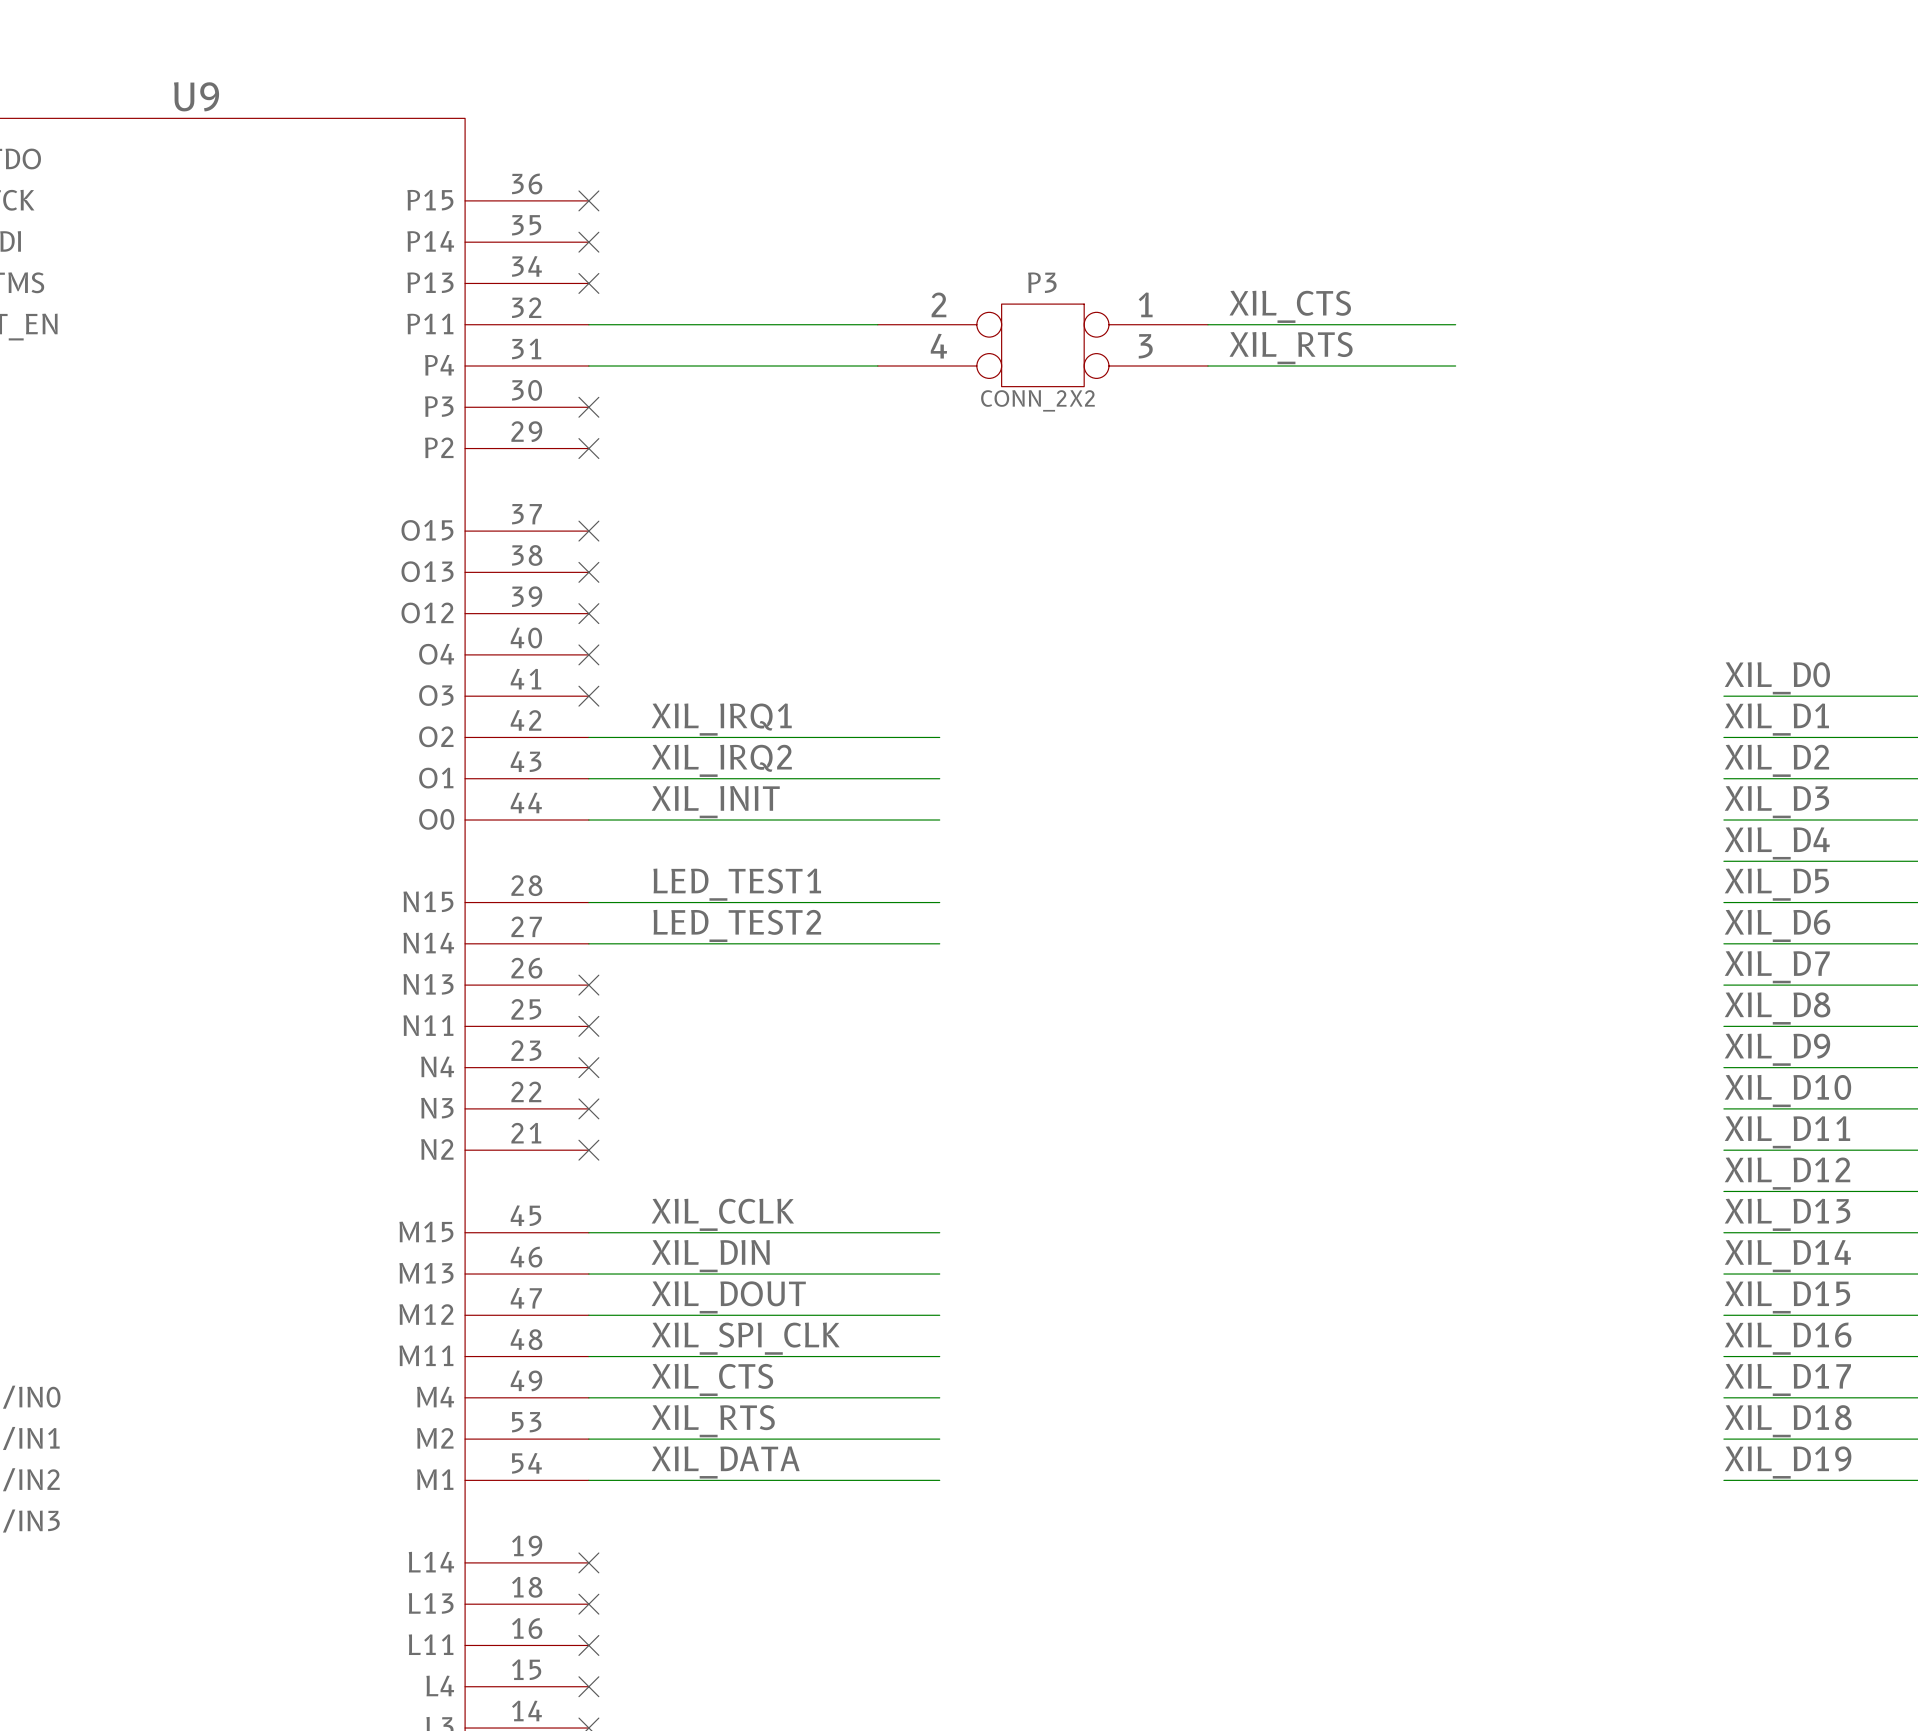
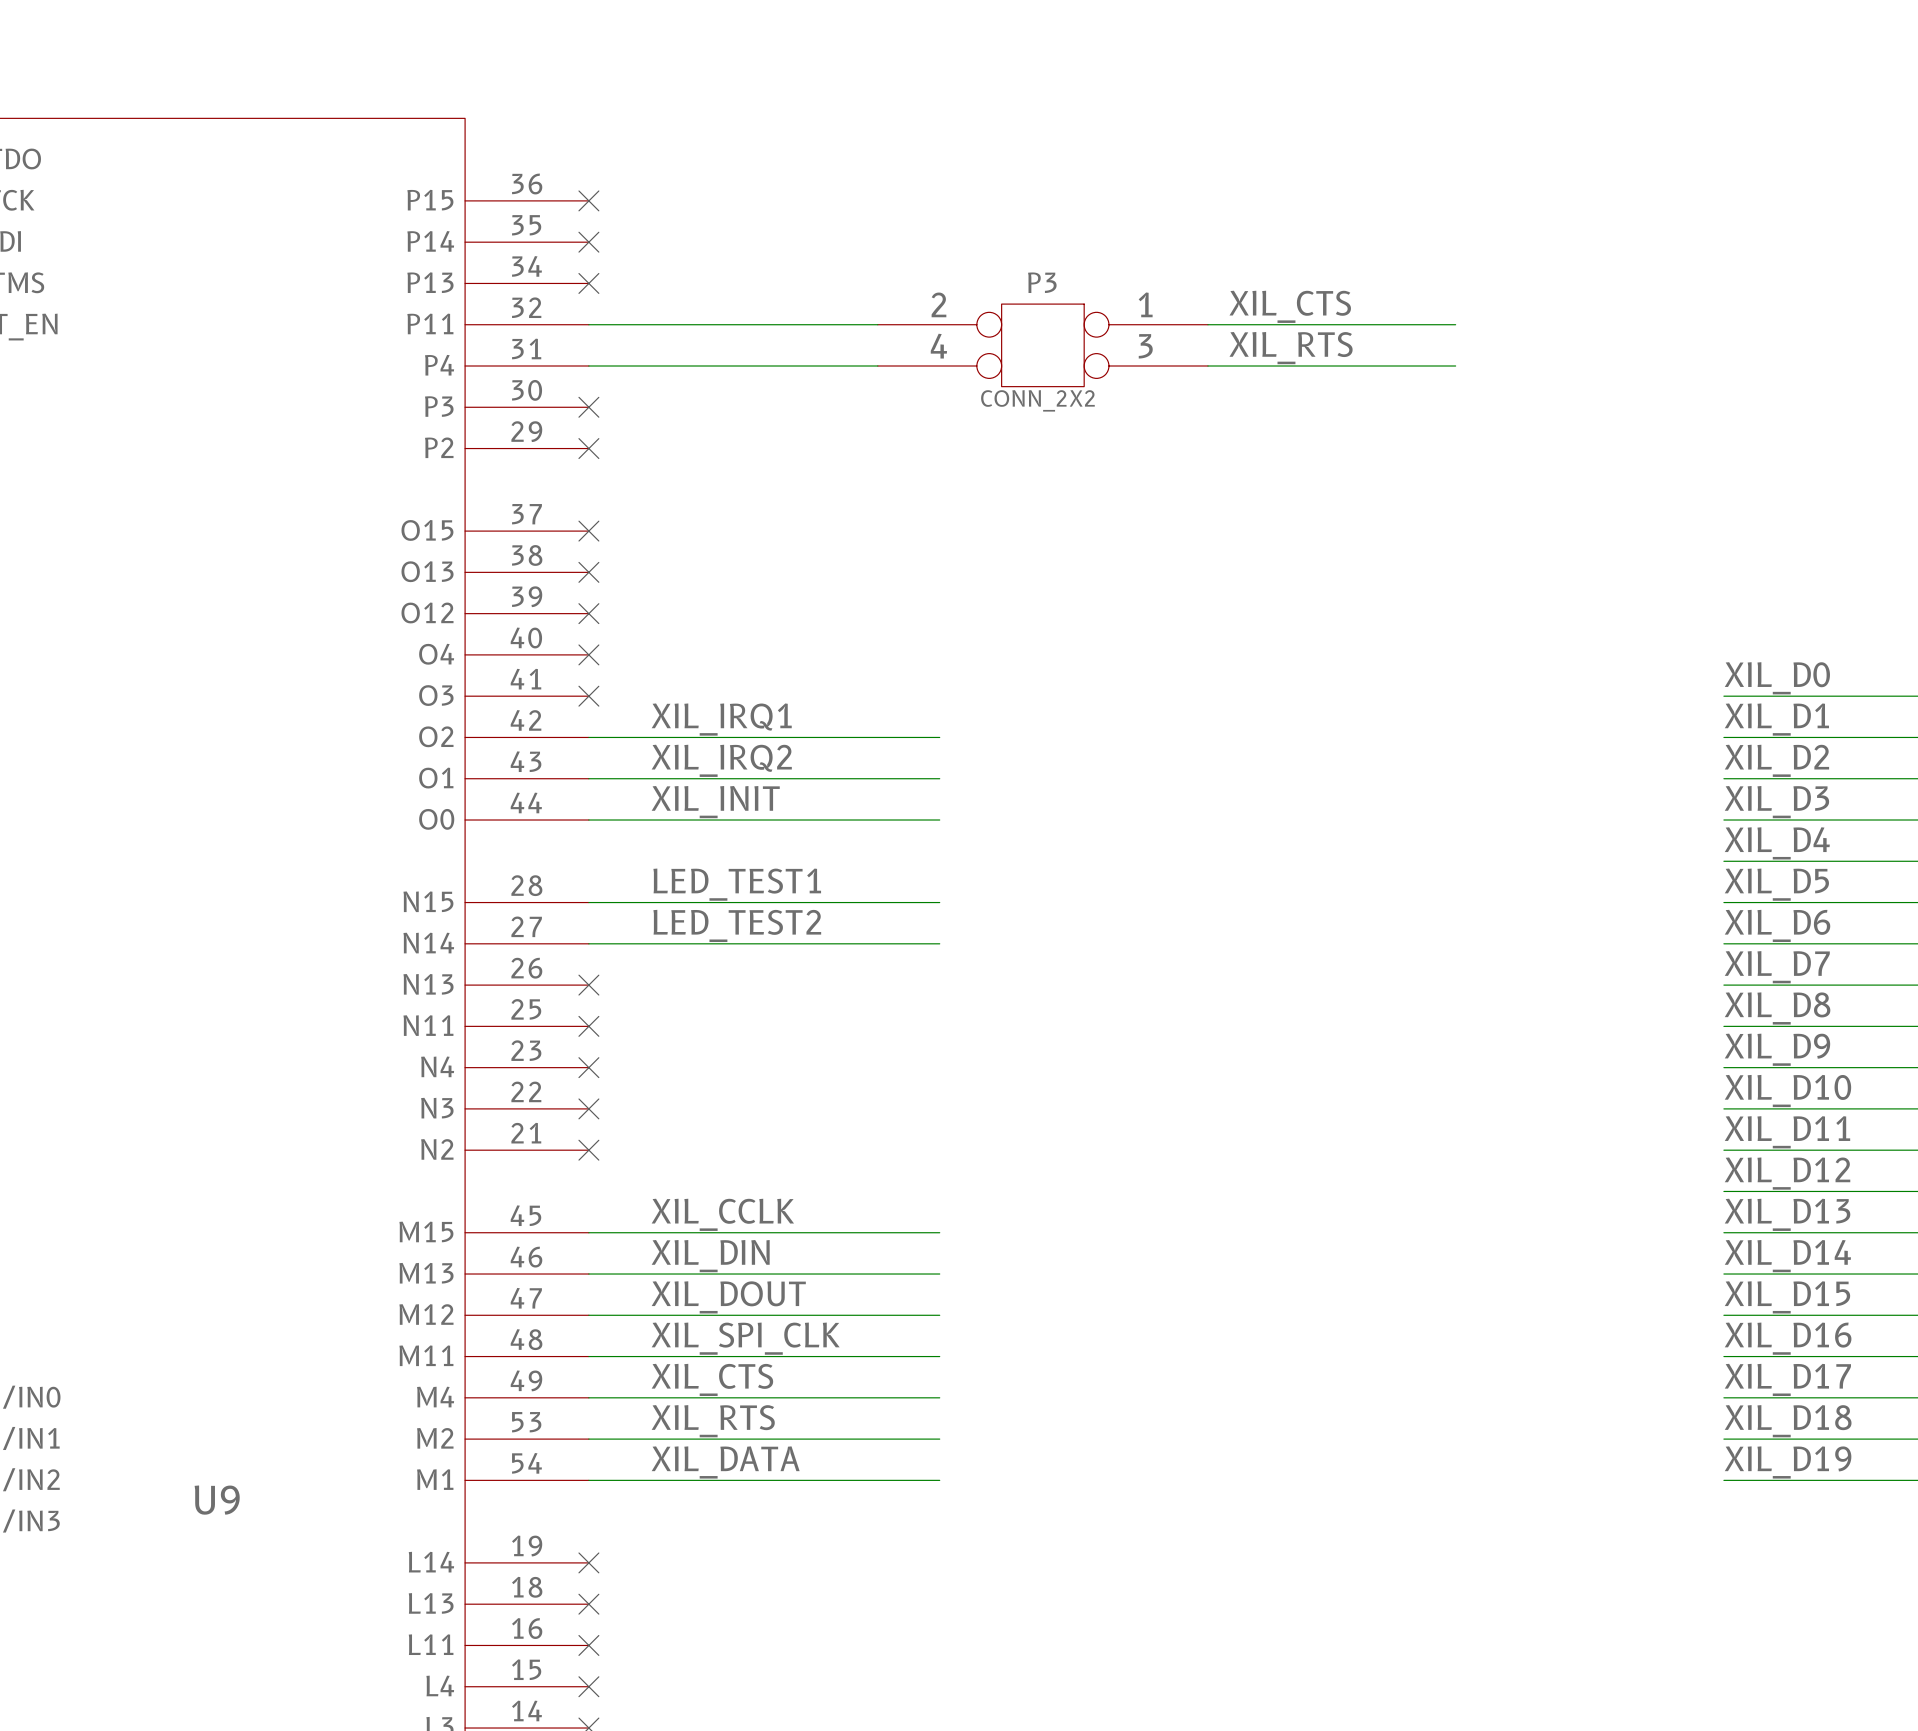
U9 name position: U9 (196, 96) -> U9 (217, 1500)

